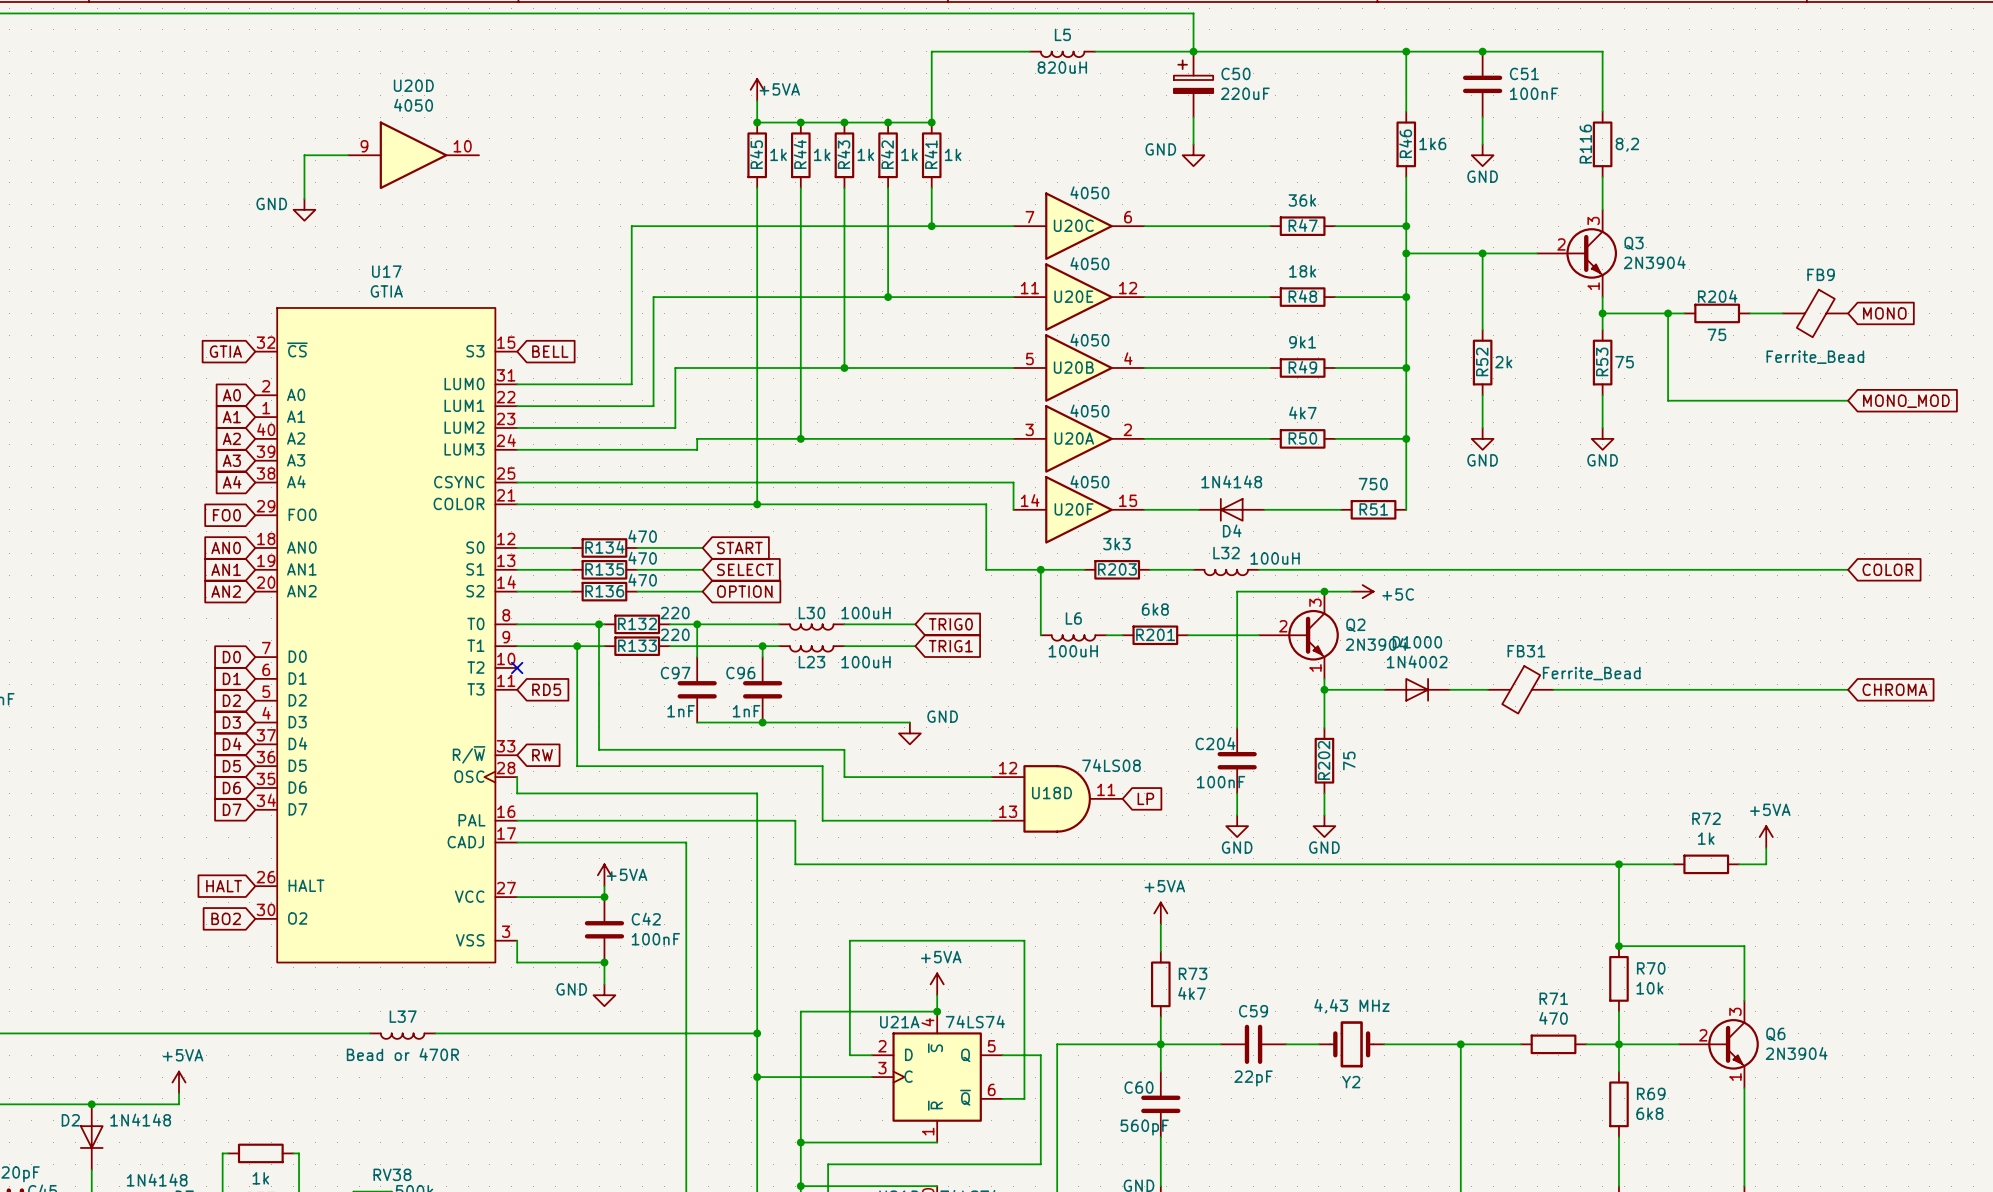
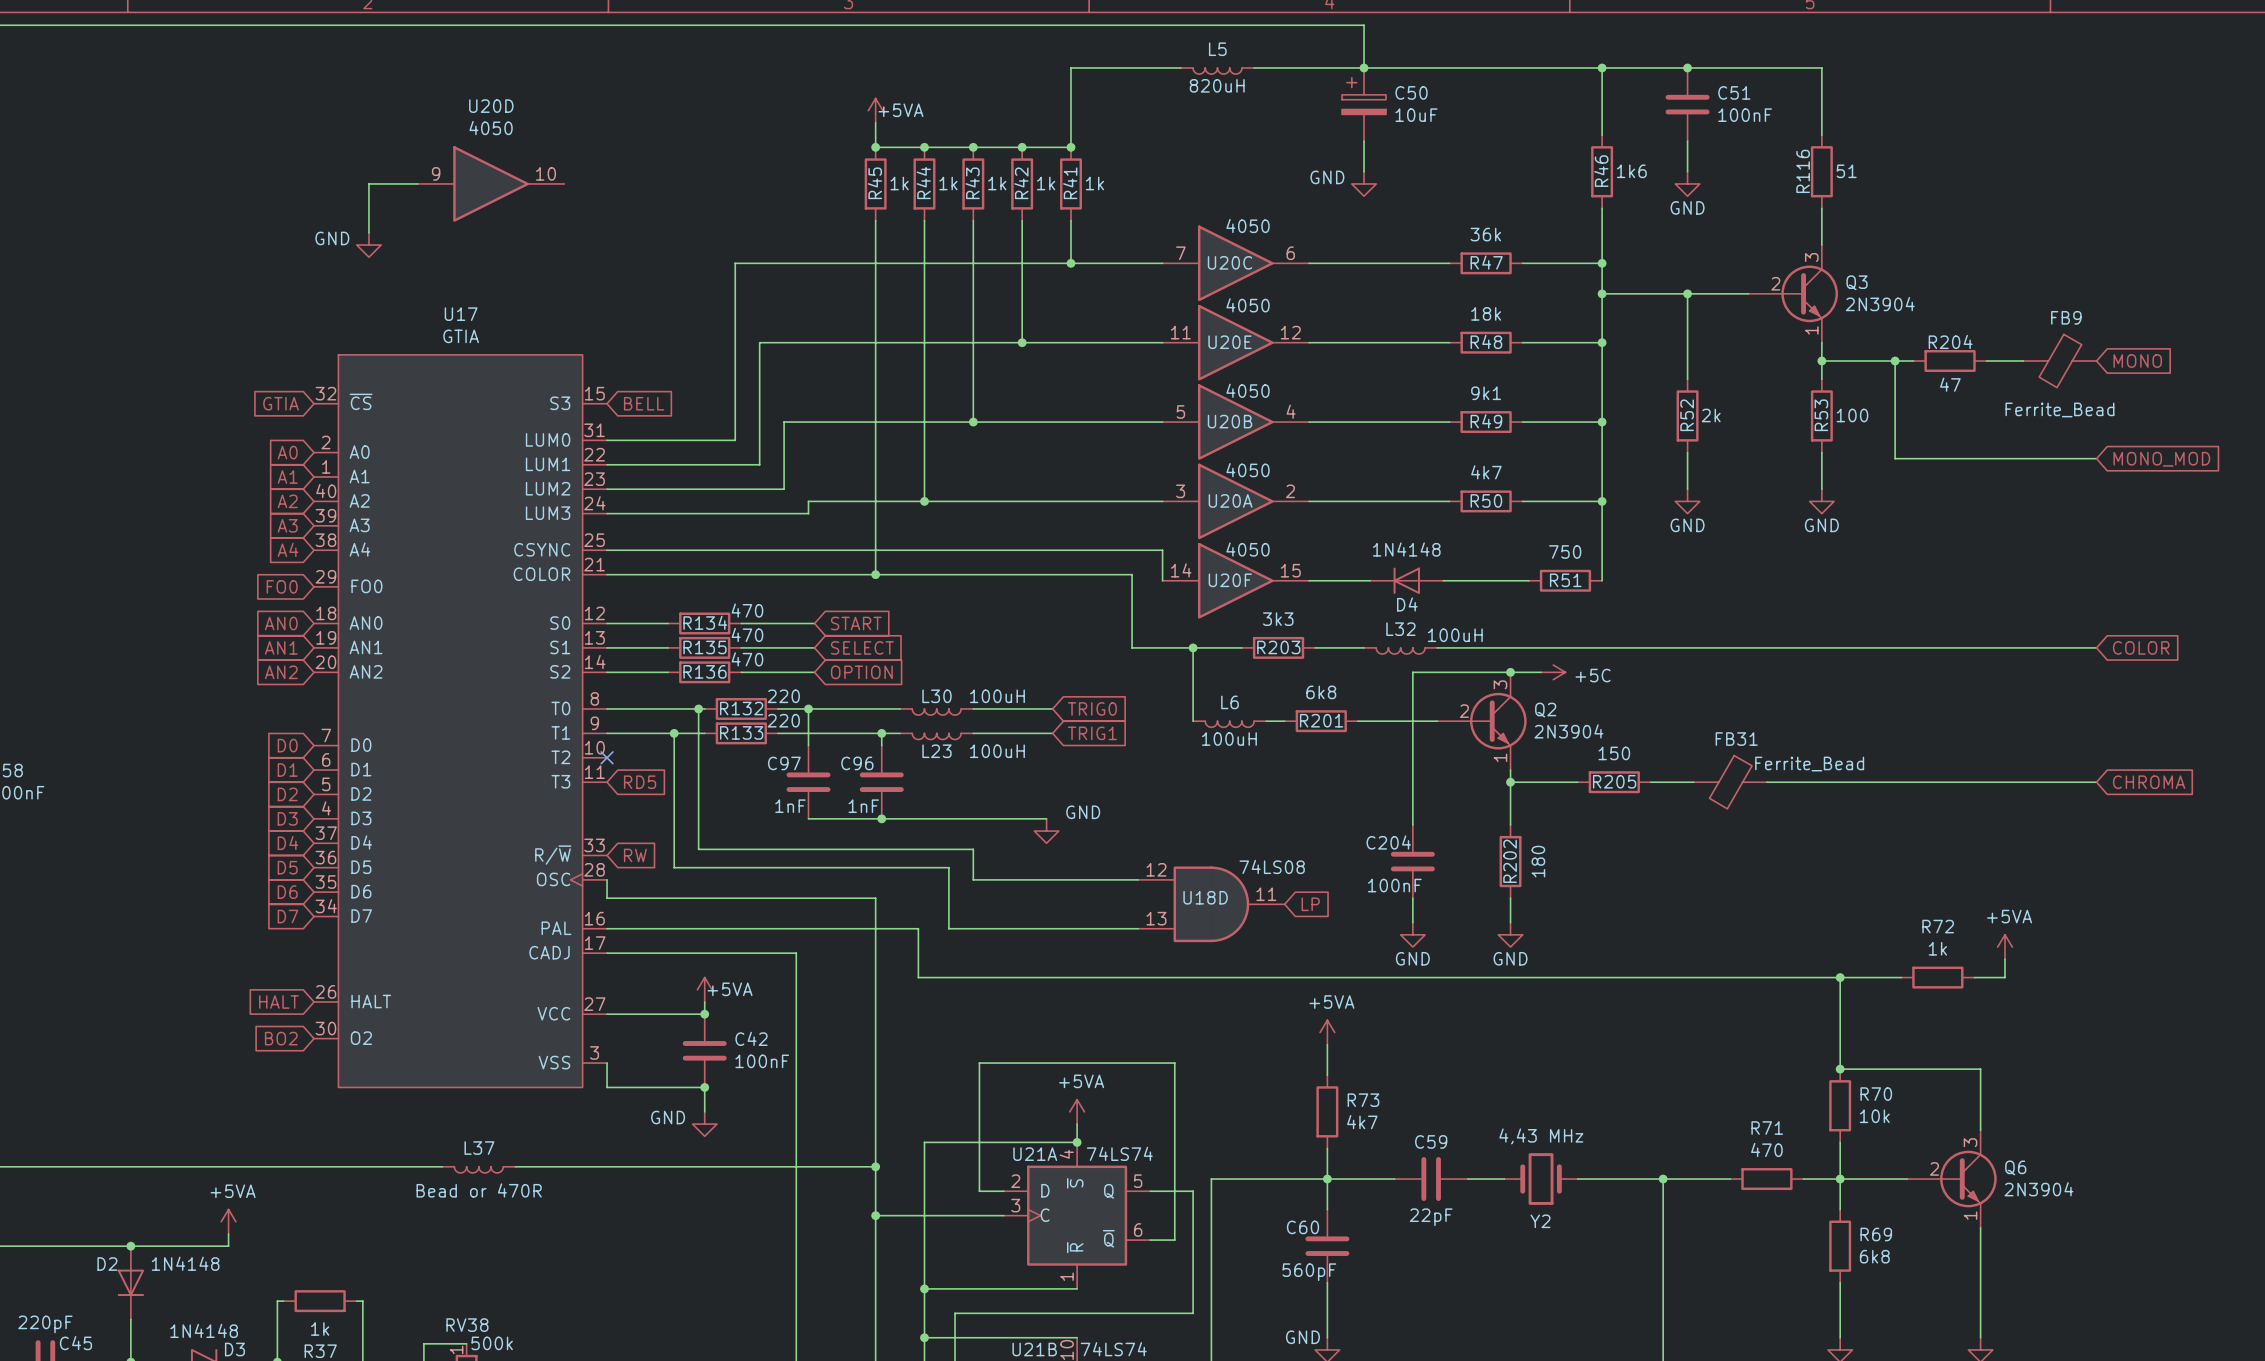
C50 value: 220uF (1245, 93) -> 10uF (1416, 115)
R116 value: 8,2 (1627, 144) -> 51 (1846, 171)
R204 value: 75 (1716, 334) -> 47 (1950, 384)
R53 value: 75 (1624, 362) -> 100 (1852, 415)
D1000: 1N4002 (1417, 689) -> none
R205: none -> 150 (1614, 782)
R202 value: 75 (1349, 760) -> 180 (1538, 861)

